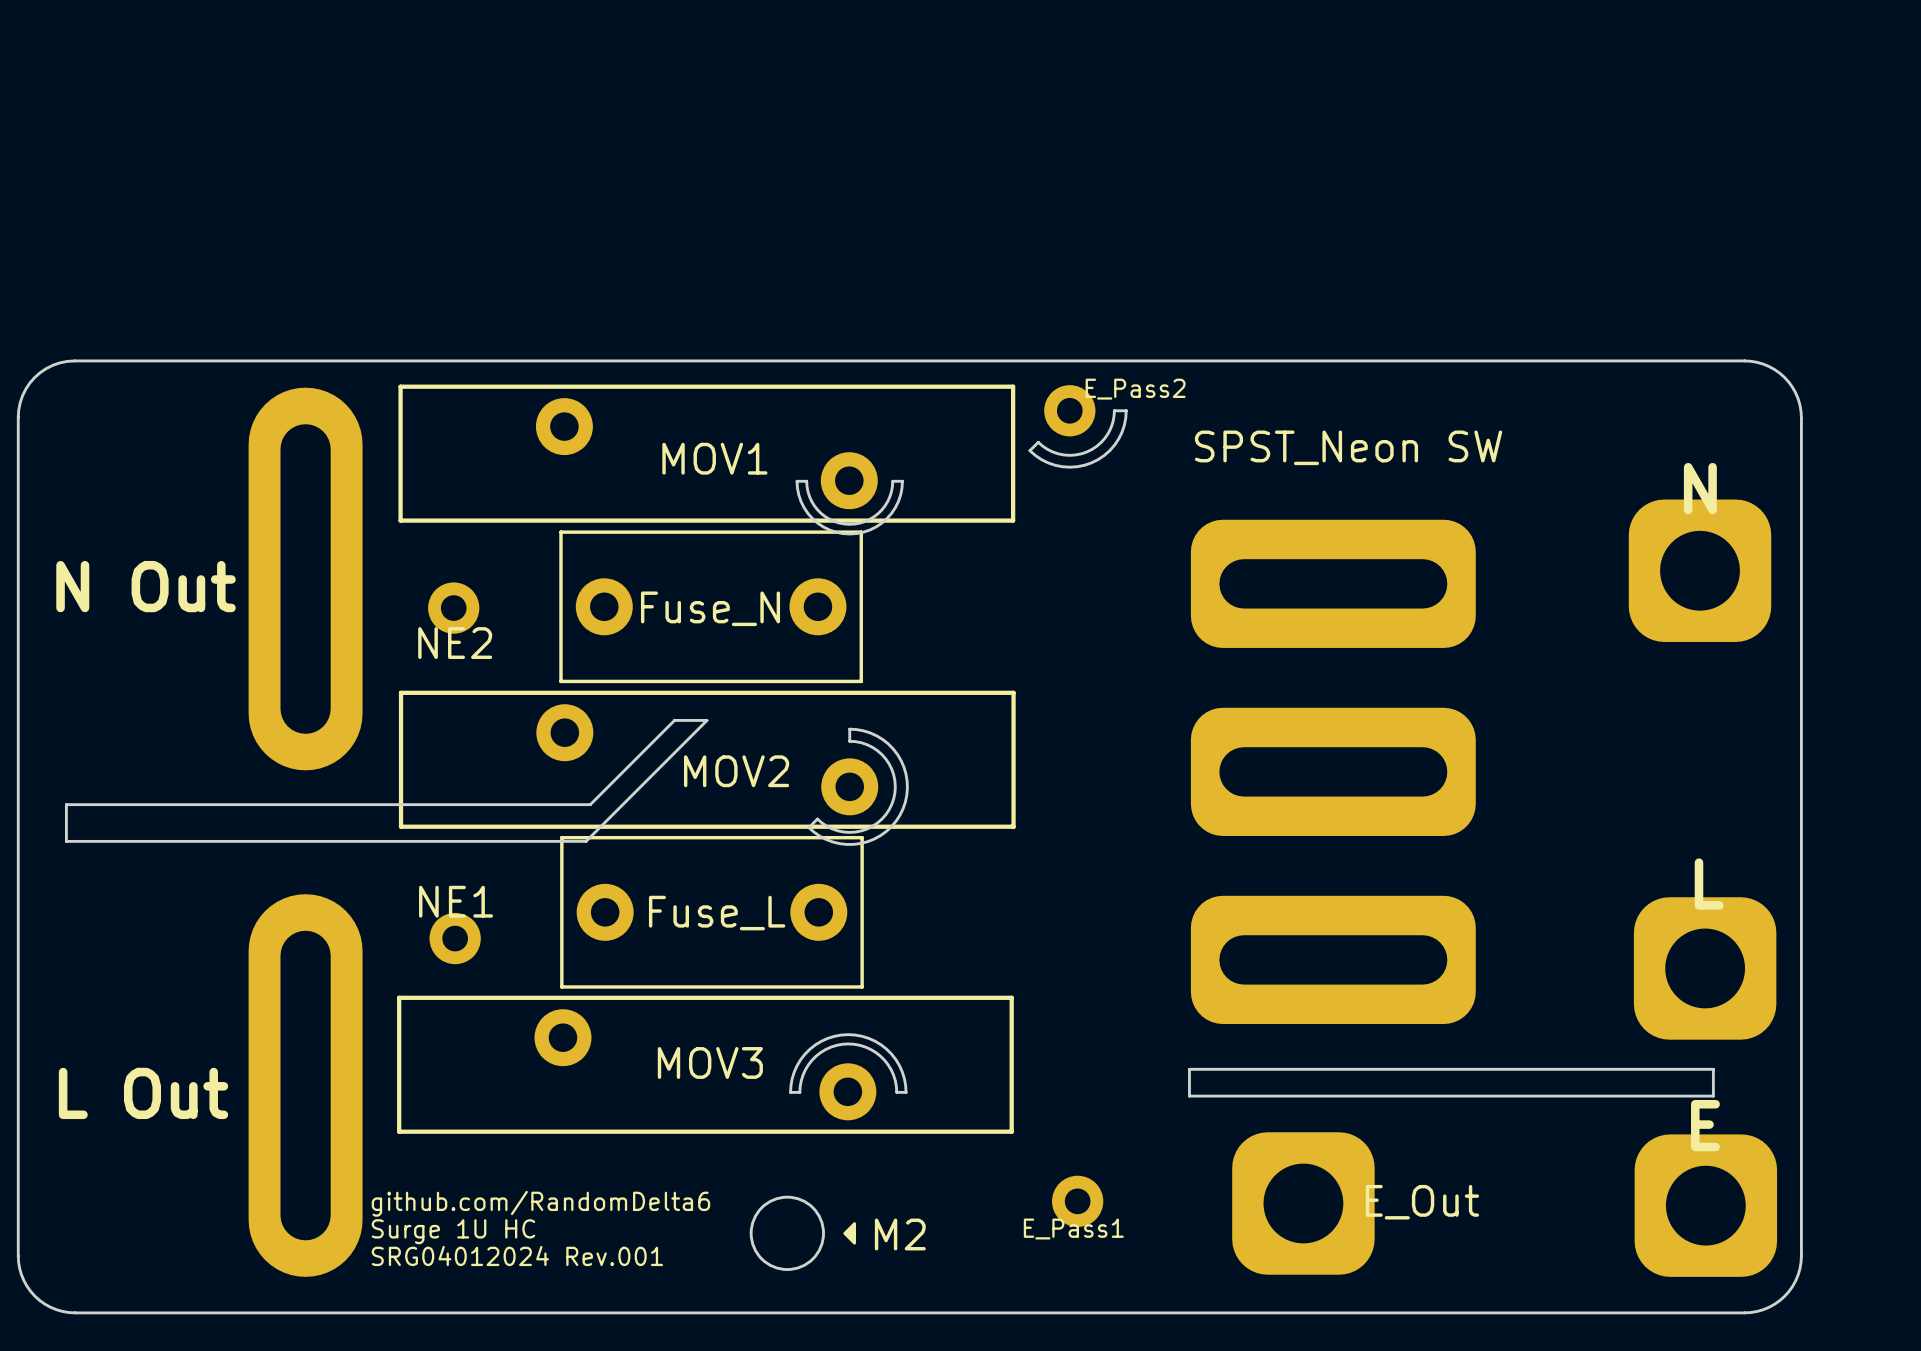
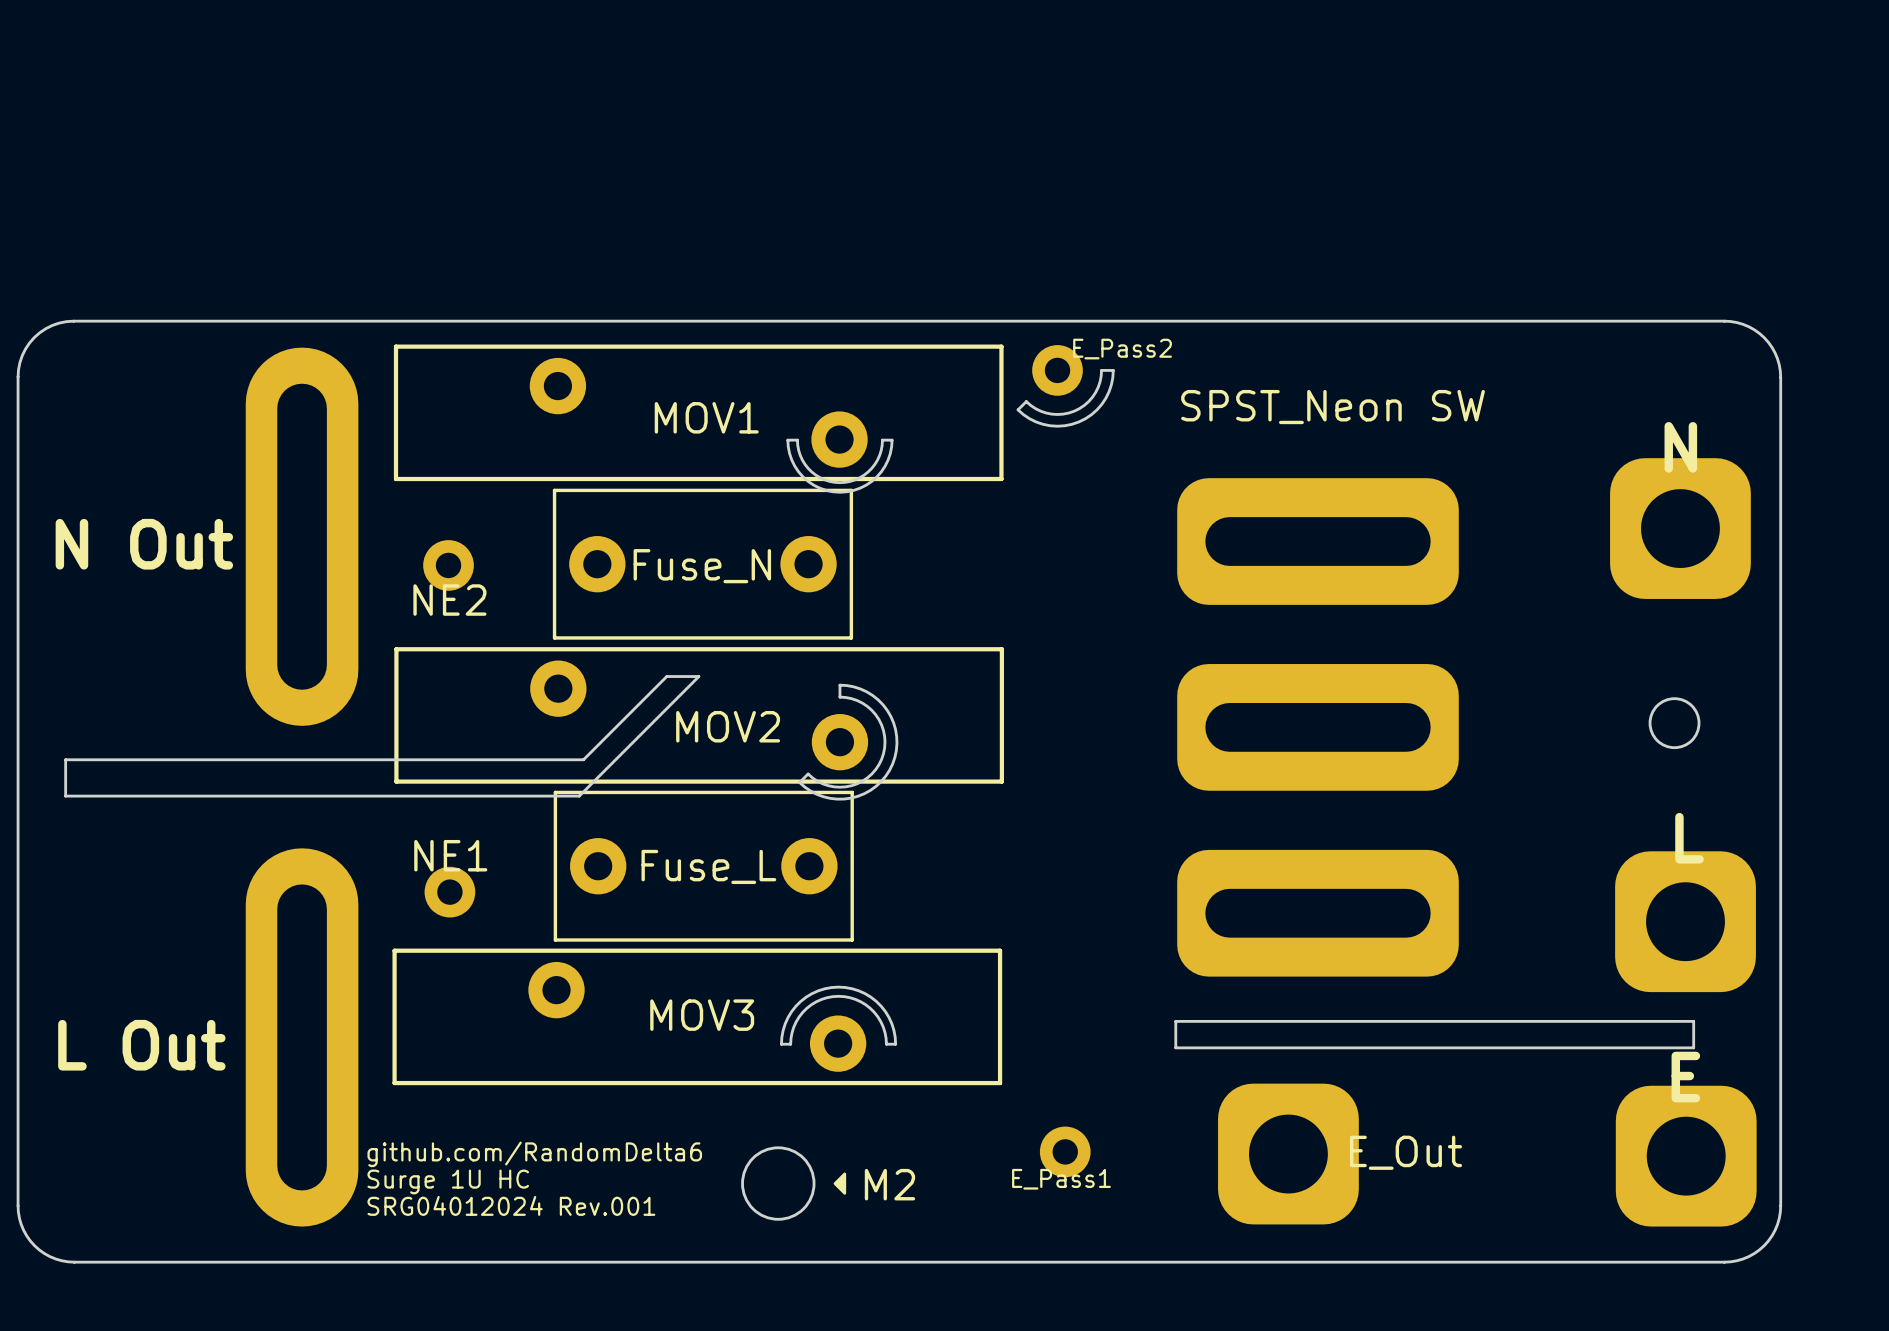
round board edge: none -> [1648, 697, 1701, 750]

